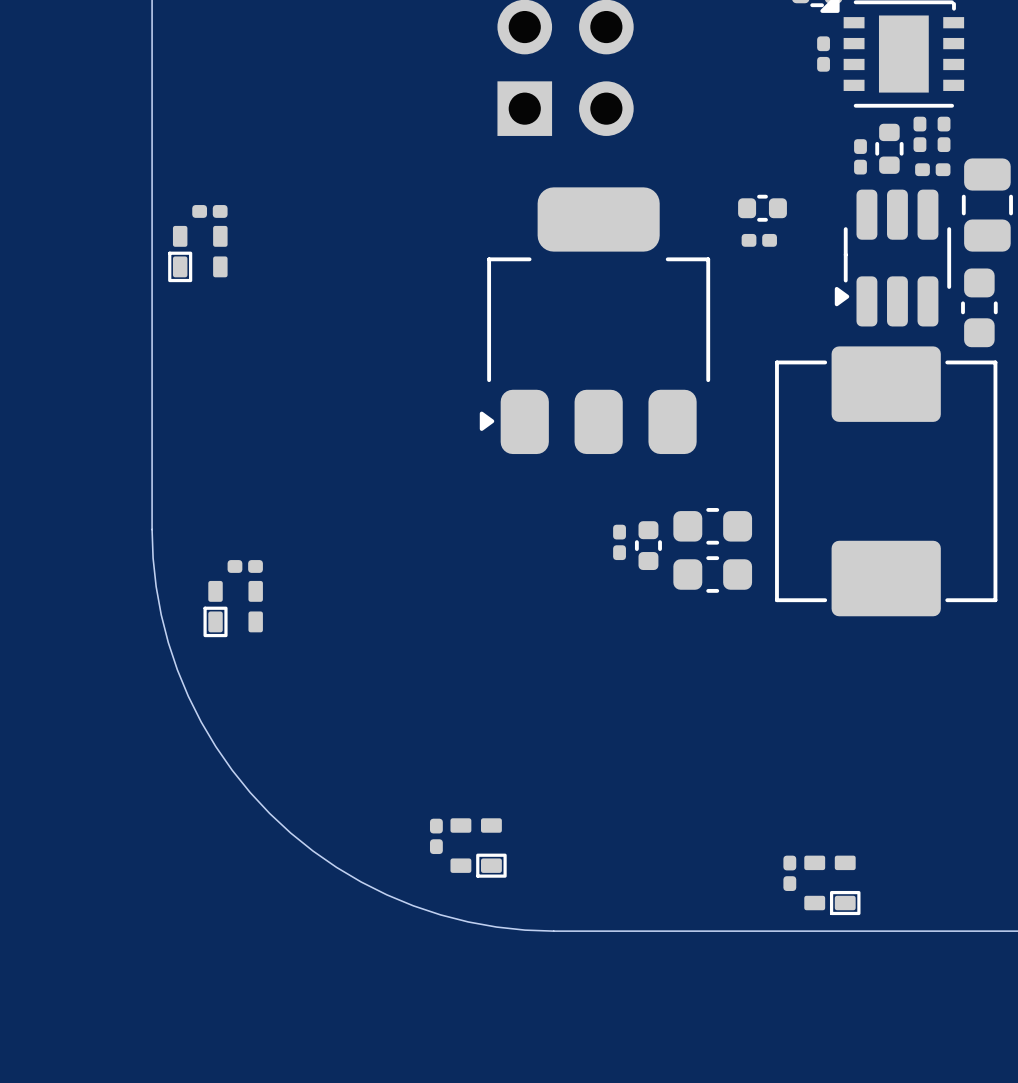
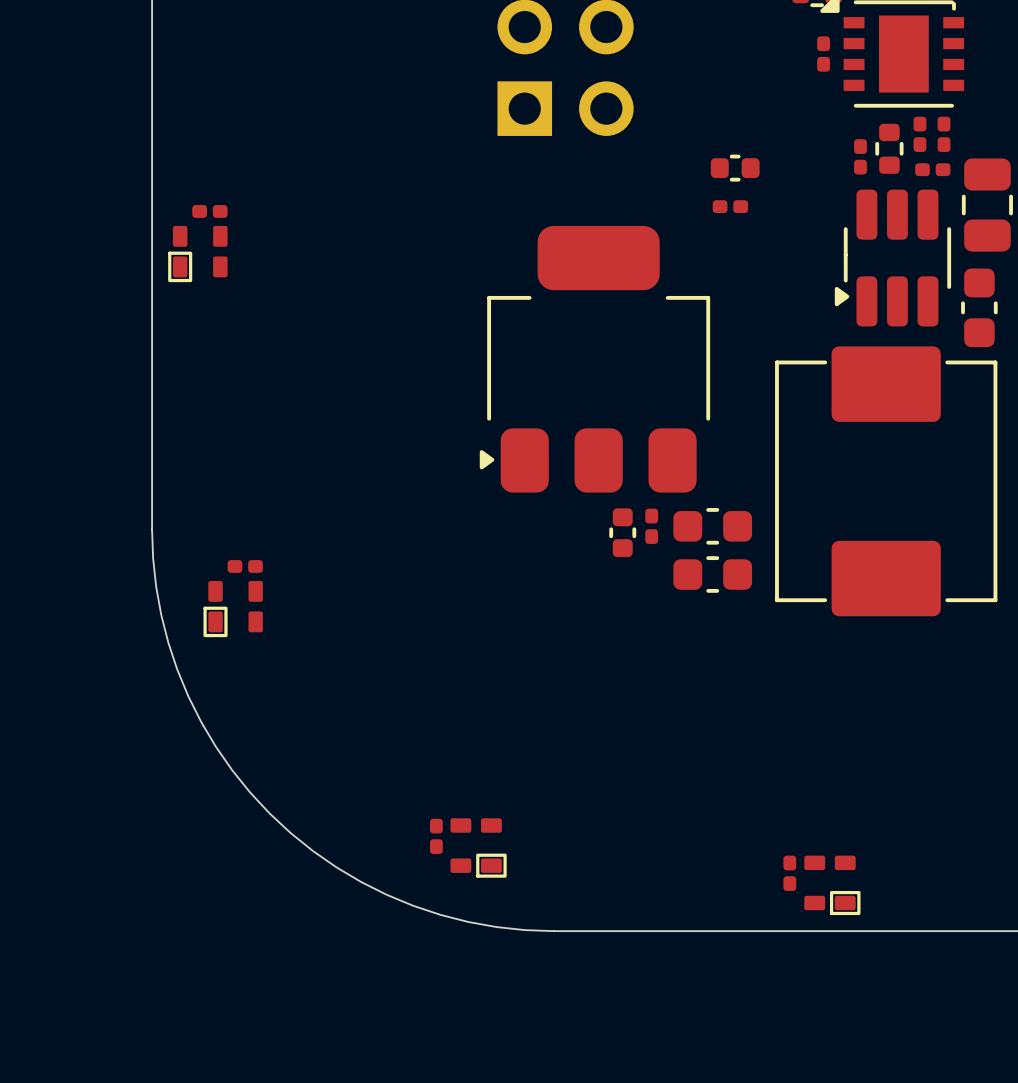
part position: (762, 208) -> (735, 168)
part position: (759, 240) -> (730, 206)
part position: (594, 320) -> (594, 359)
part footprint: [613, 524, 626, 561] -> [609, 508, 637, 558]
part: none -> (651, 526)
part: (648, 545) -> none

